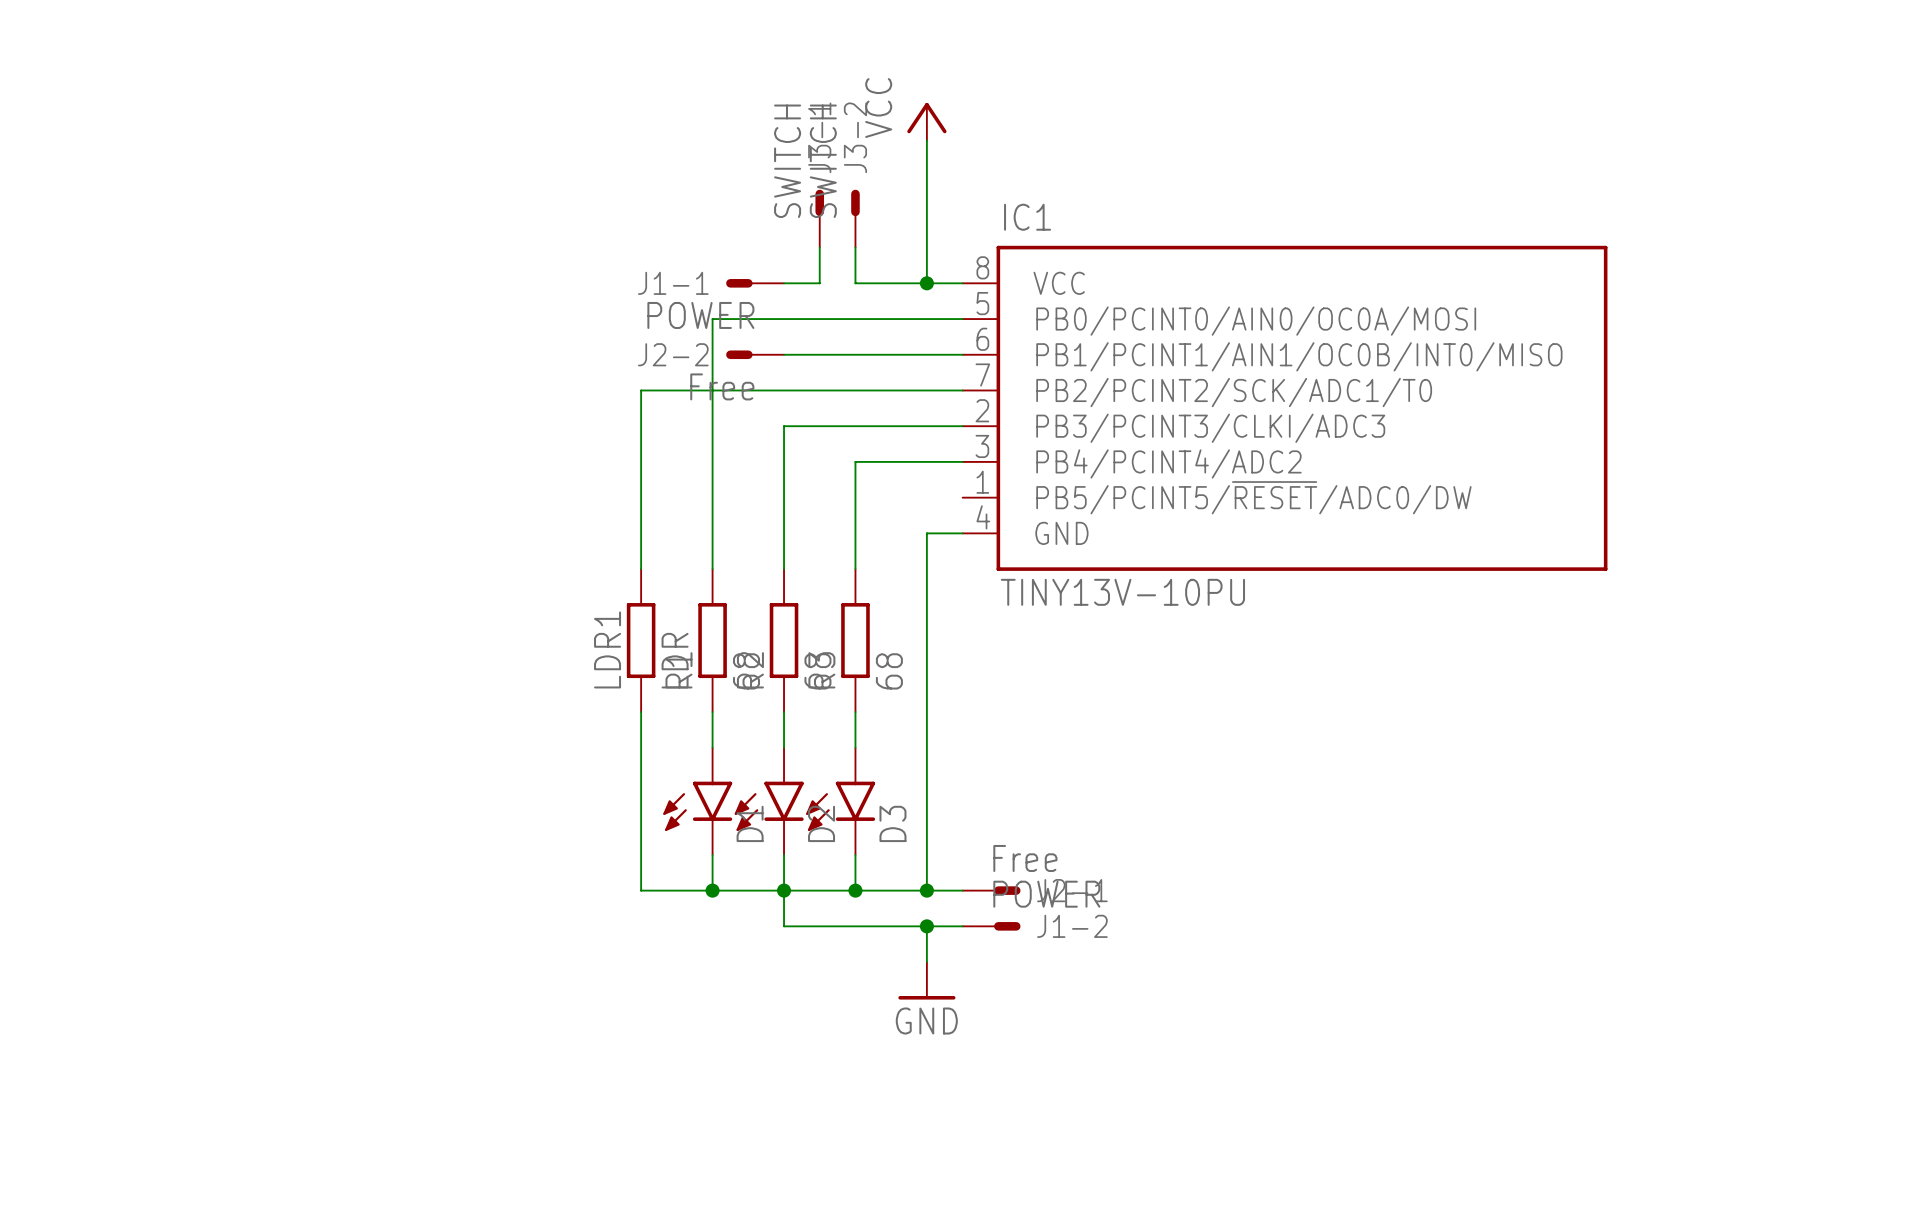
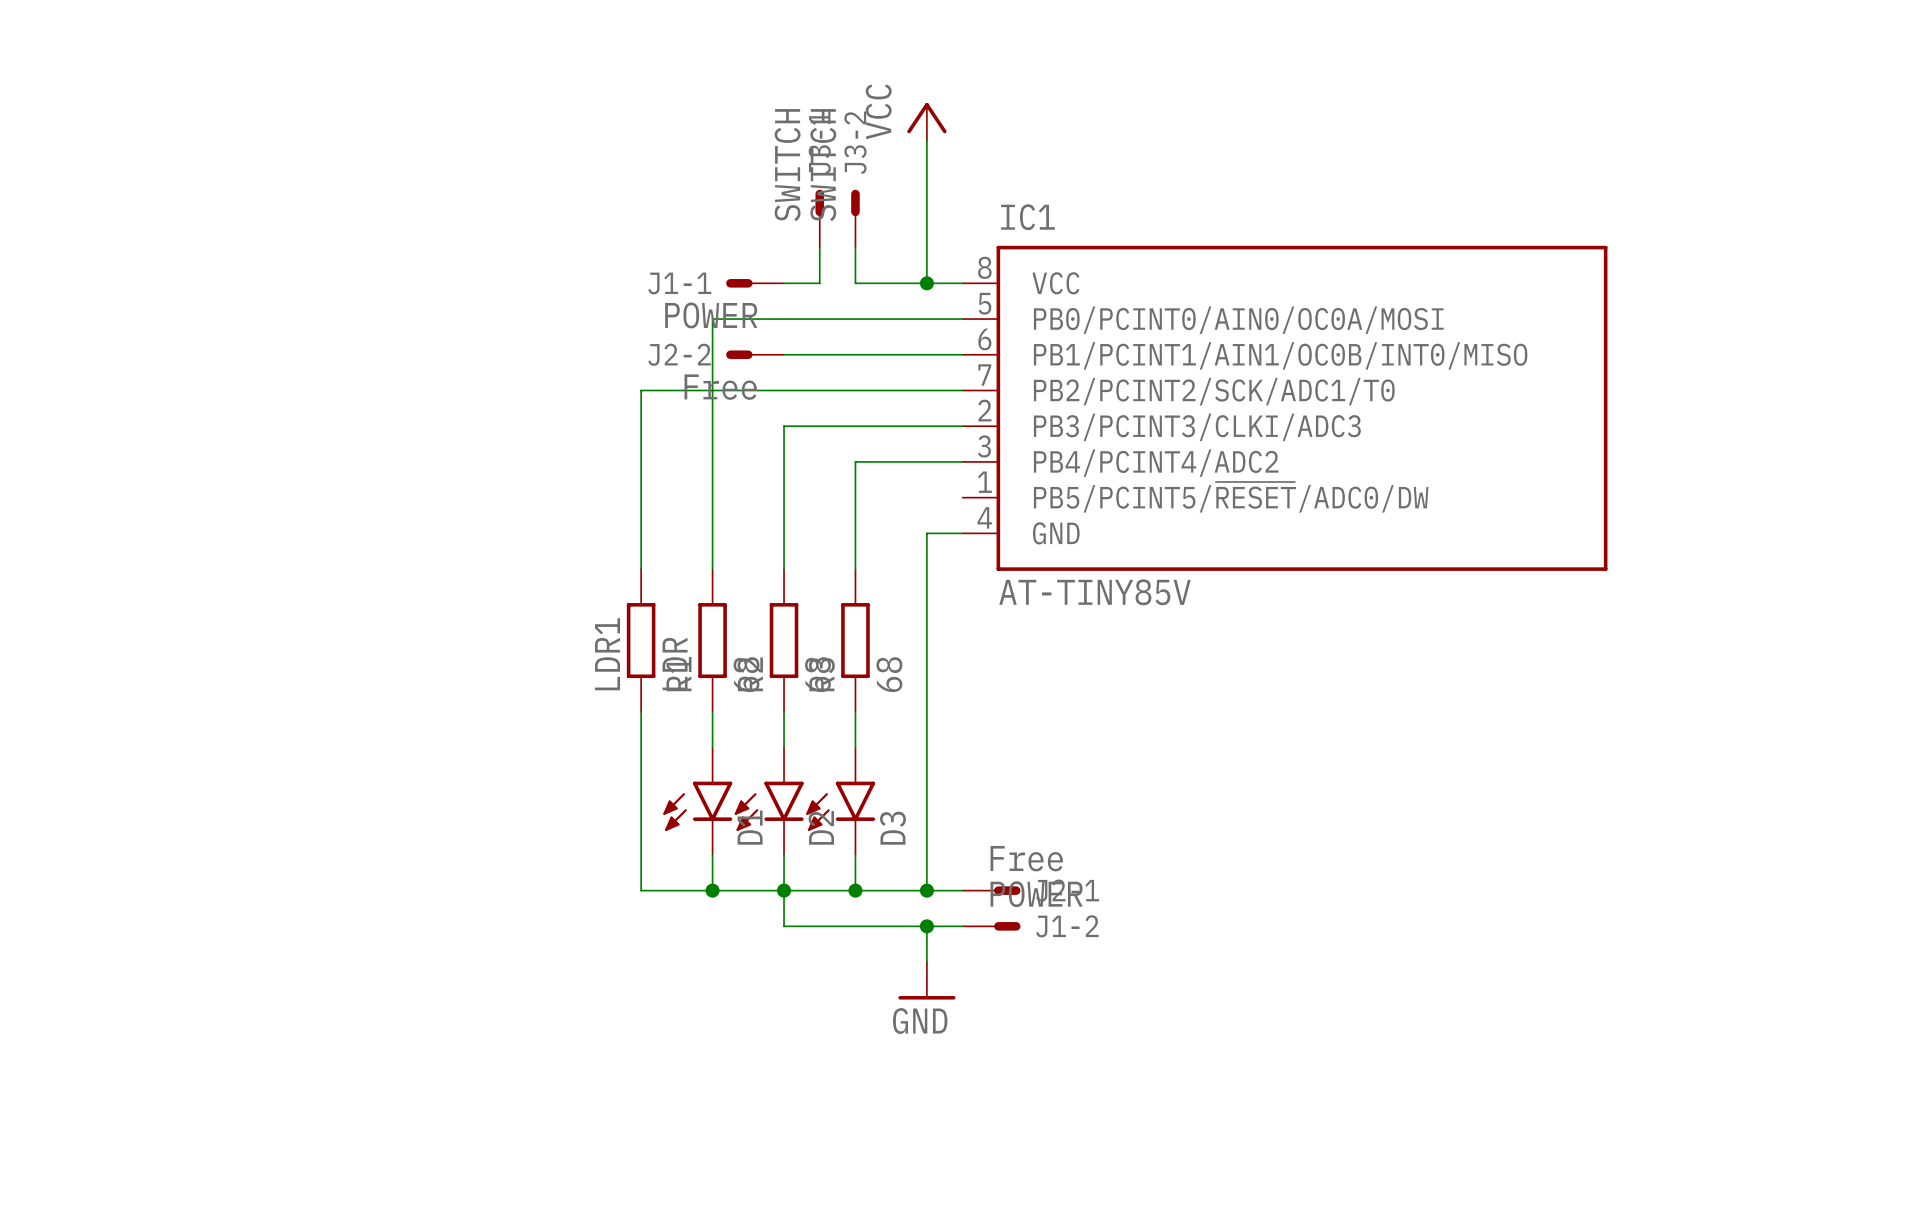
IC1 value: TINY13V-10PU (1122, 592) -> AT-TINY85V (1095, 592)

